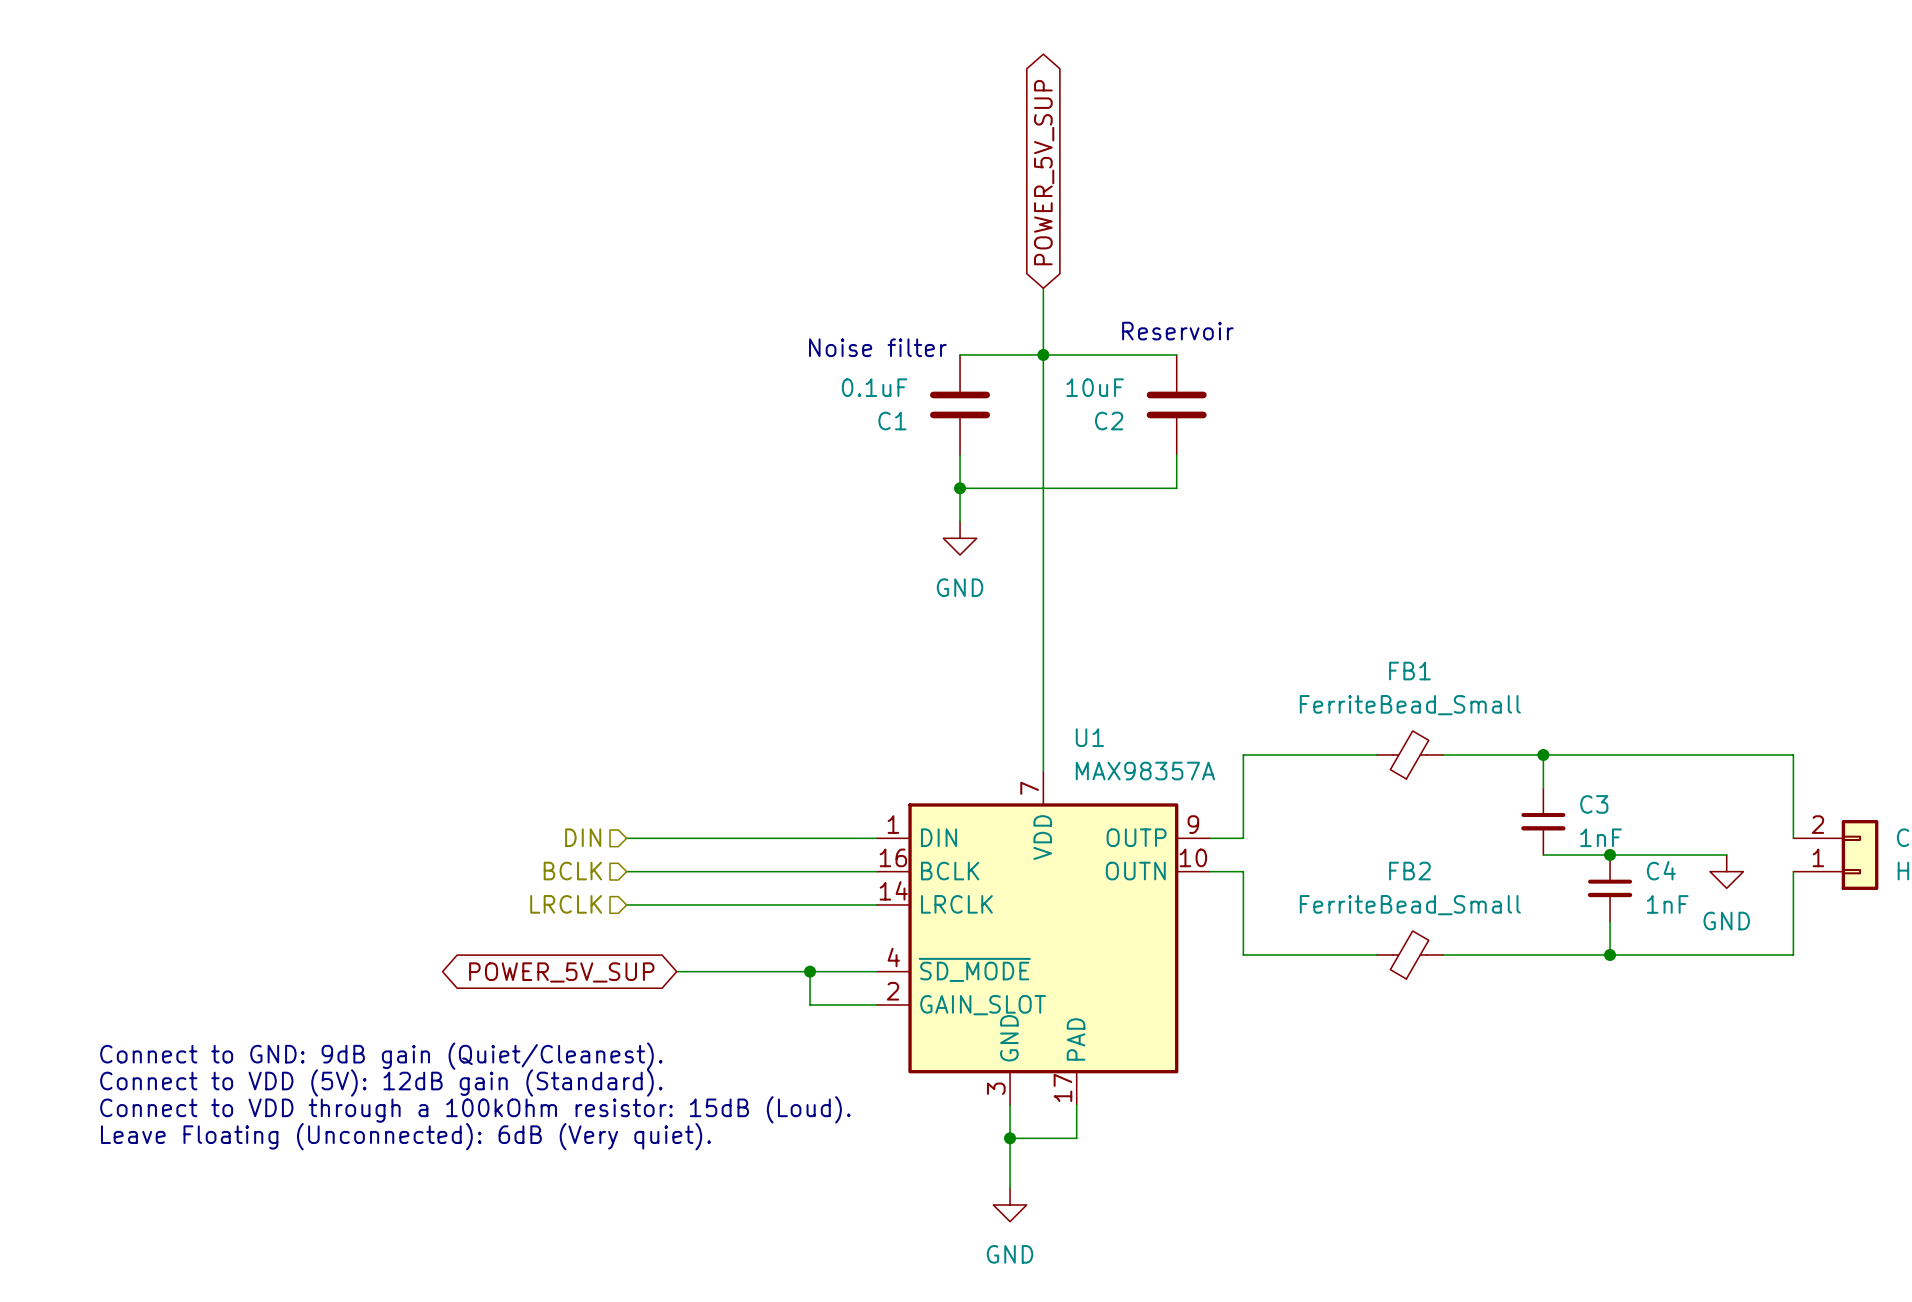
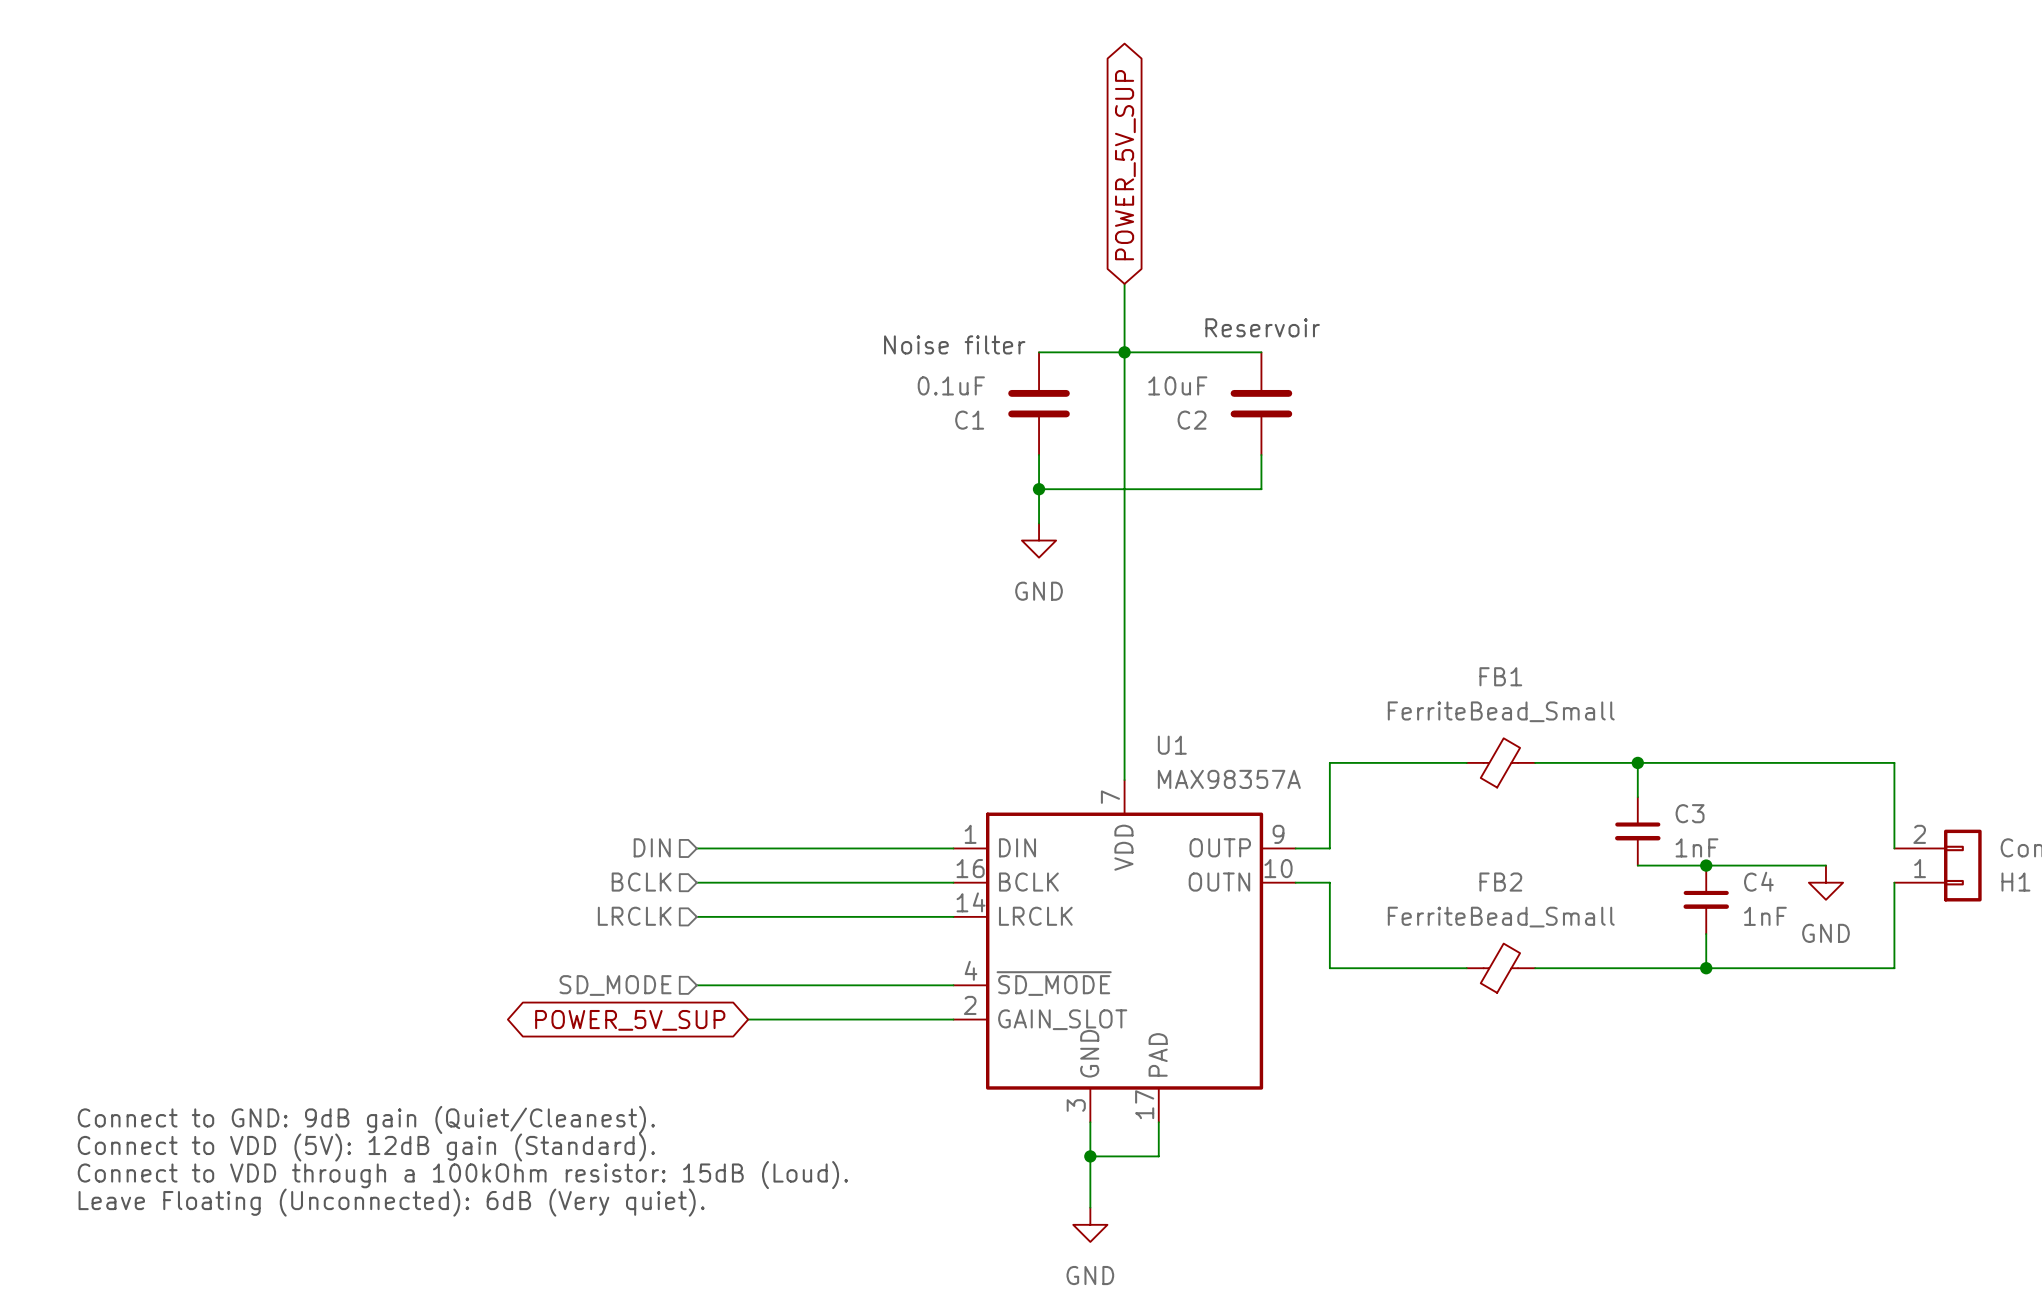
hierarchical label: none -> SD_MODE (615, 985)
wire: none -> (696, 985) (748, 985)
wire: (810, 971) (810, 1004) -> (748, 1019) (885, 1019)
junction: (810, 971) -> none
global label position: POWER_5V_SUP (561, 972) -> POWER_5V_SUP (630, 1020)
text position: Connect to GND: 9dB gain (Quiet/Cleanest). (381, 1056) -> Connect to GND: 9dB gain (Quiet/Cleanest). (366, 1119)
text position: Connect to VDD (5V): 12dB gain (Standard). (381, 1082) -> Connect to VDD (5V): 12dB gain (Standard). (366, 1147)
text position: Connect to VDD through a 100kOhm resistor: 15dB (Loud). (475, 1109) -> Connect to VDD through a 100kOhm resistor: 15dB (Loud). (462, 1175)
text position: Leave Floating (Unconnected): 6dB (Very quiet). (405, 1136) -> Leave Floating (Unconnected): 6dB (Very quiet). (391, 1202)

